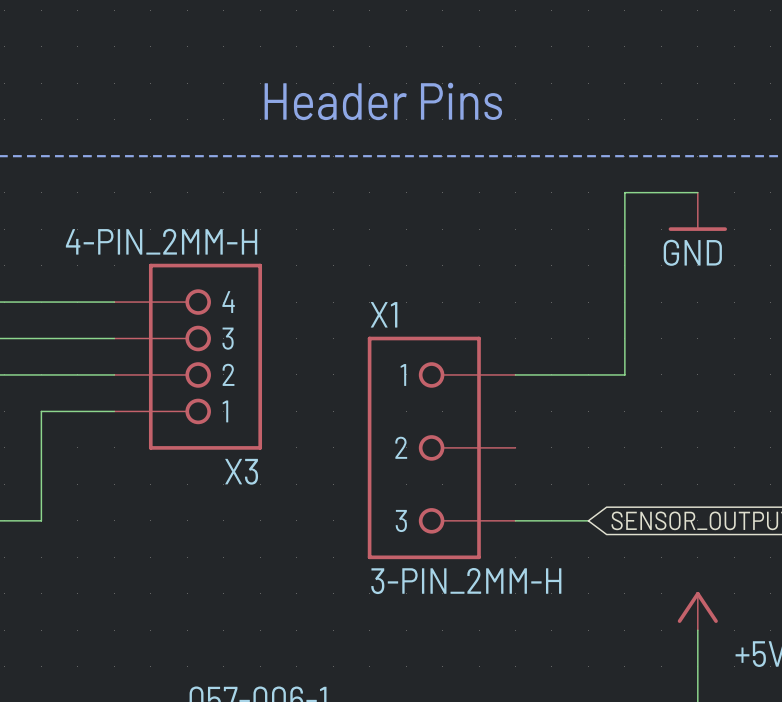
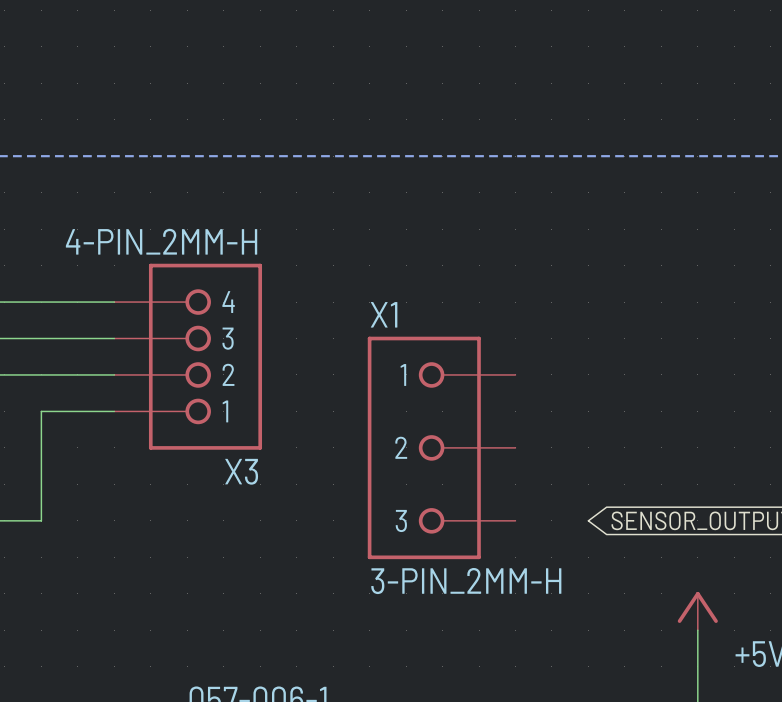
text: Header Pins (383, 101) -> none
wire: (697, 192) (624, 192) (624, 374) (515, 374) -> none
power symbol: GND (697, 211) -> none
wire: (515, 520) (588, 520) -> none

